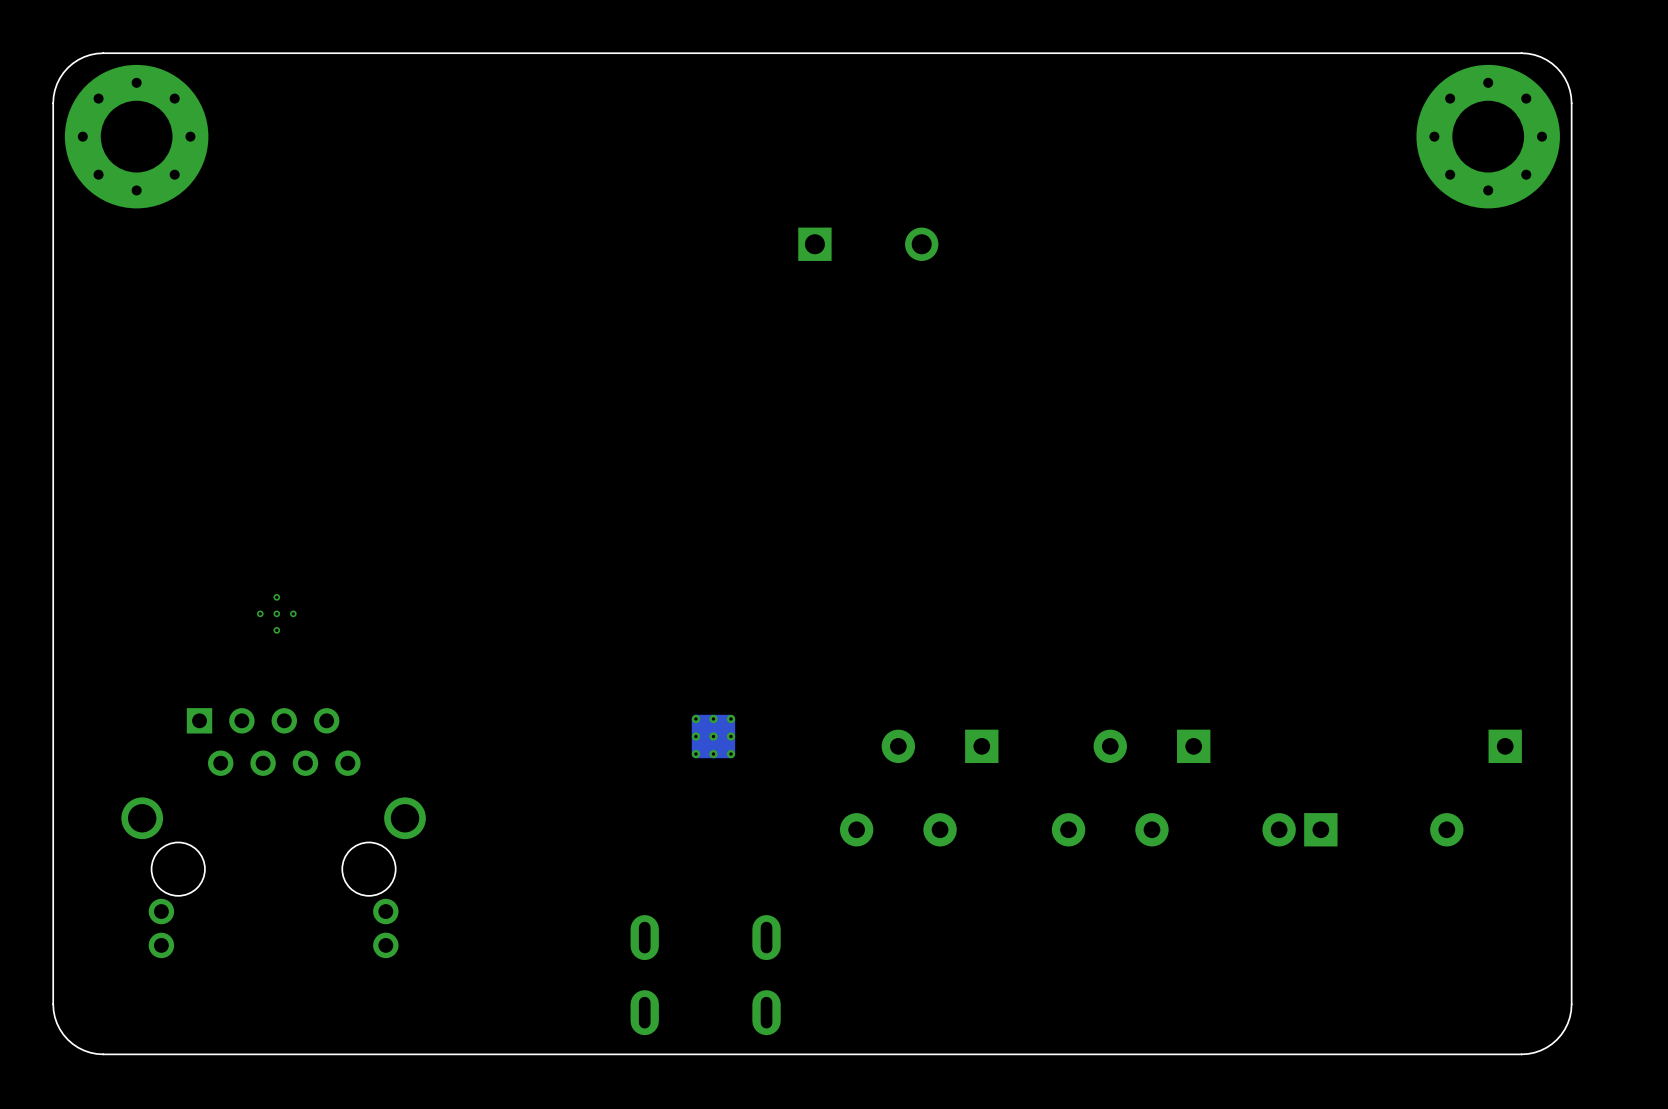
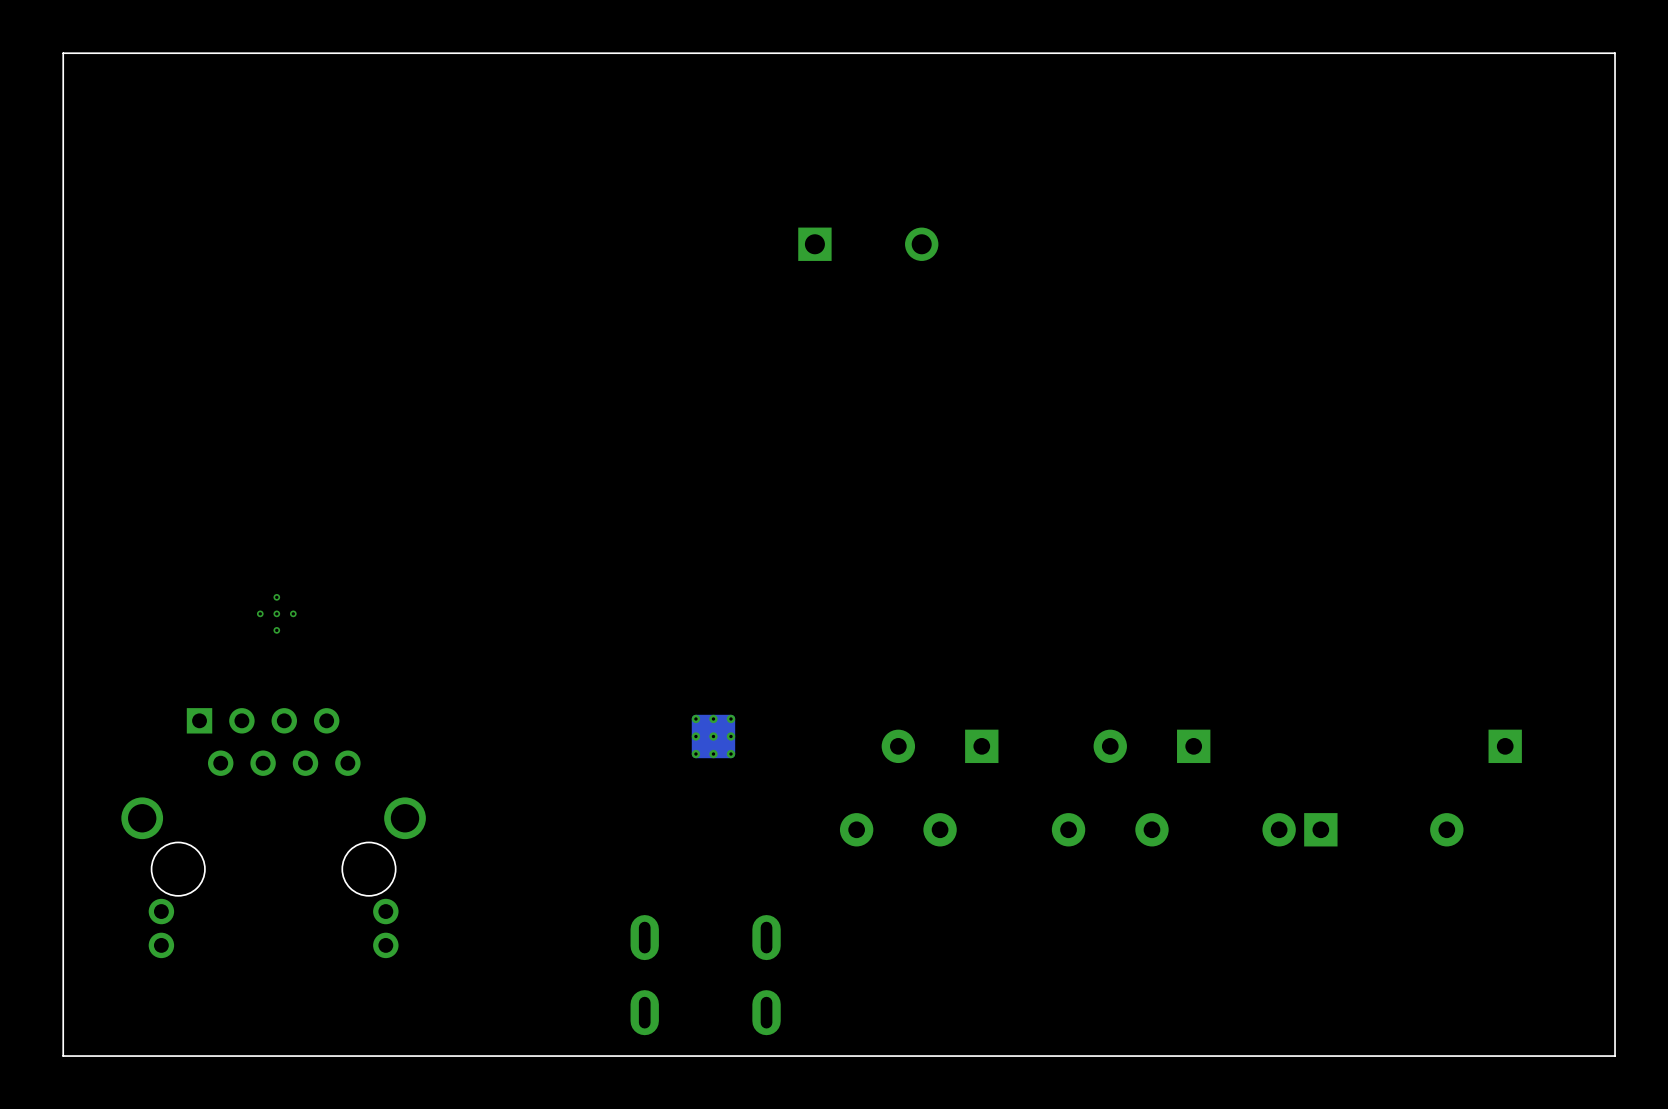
board edge: (1521, 53) (1540, 57) (1556, 67) (1567, 84) (1571, 103) (1571, 1004) (1567, 1023) (1556, 1039) (1540, 1050) (1521, 1054) (103, 1054) (84, 1050) (72, 1044) (59, 1029) (54, 1017) (53, 1004) (53, 103) (57, 84) (67, 67) (84, 57) (103, 53) -> (1521, 53) (1615, 53) (1615, 1056) (63, 1056) (63, 53) (103, 53)
part: (136, 136) -> none
part: (1488, 136) -> none

